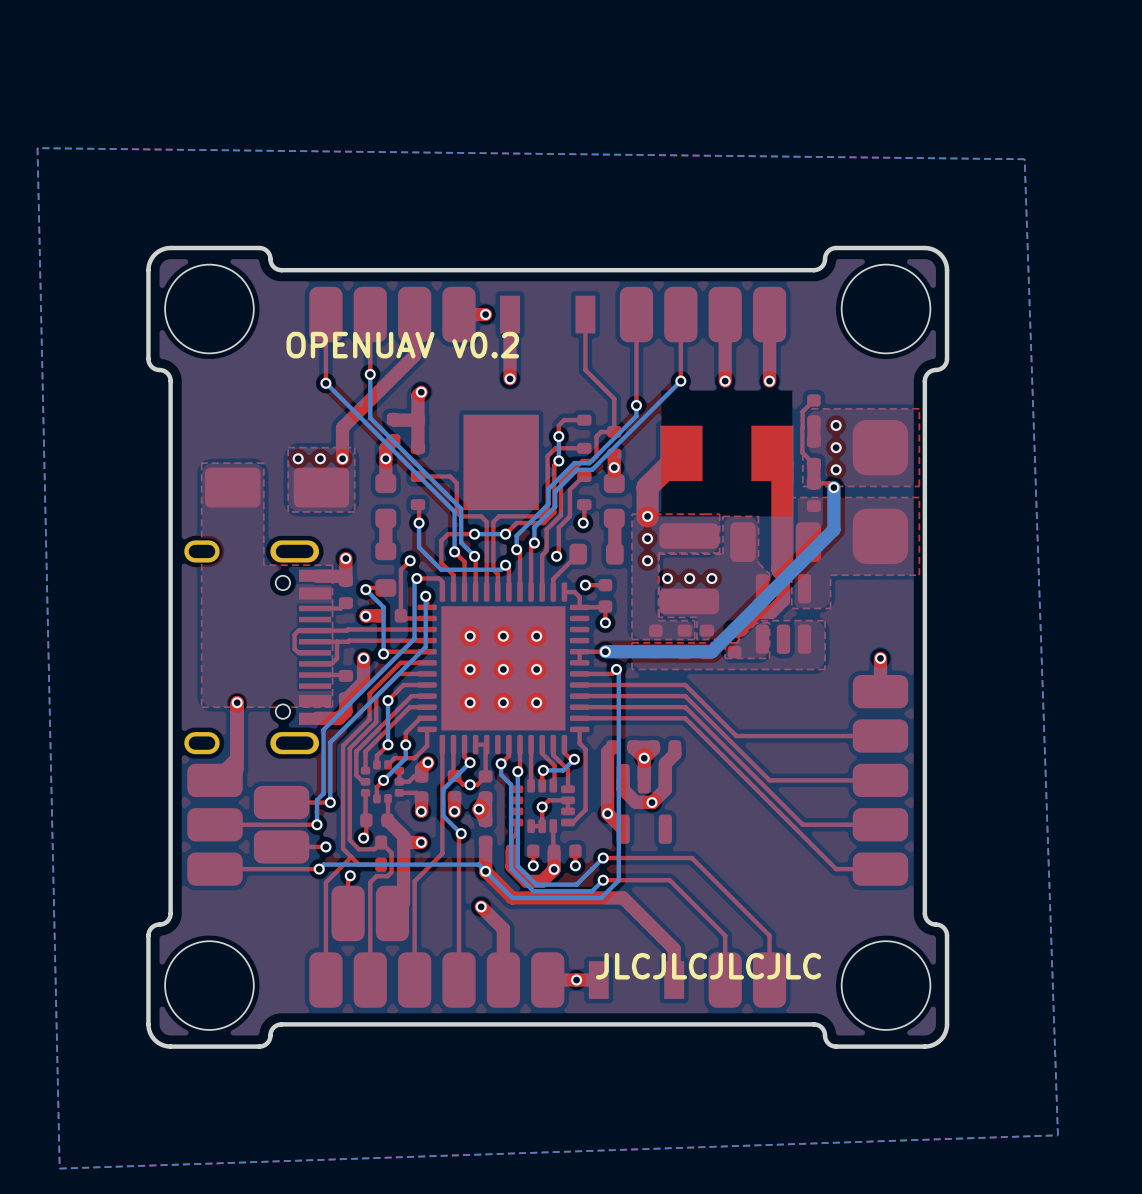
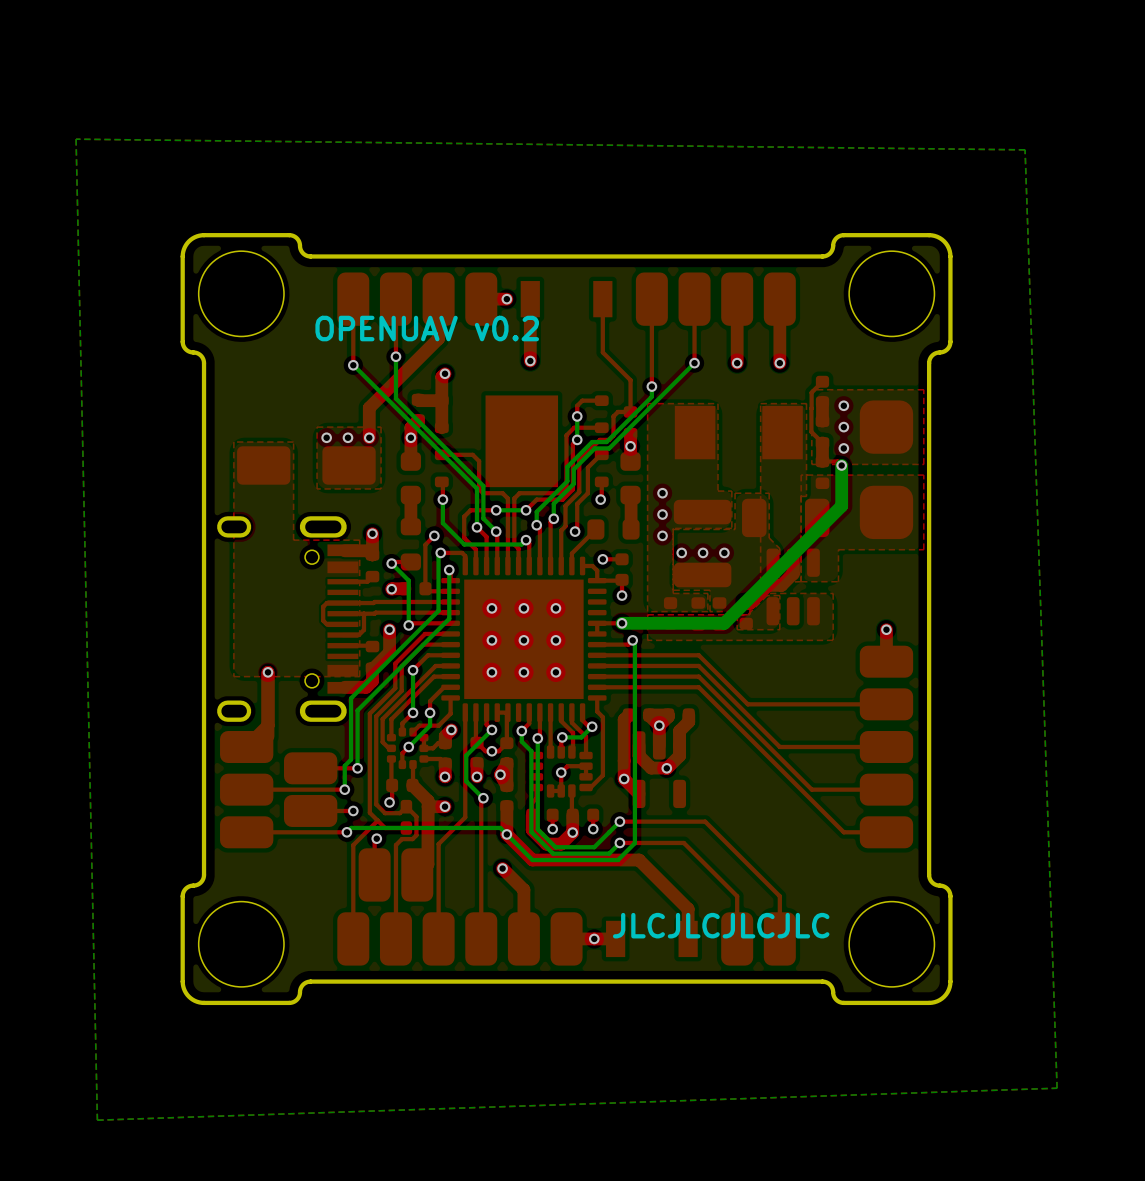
top track: (681, 453) (647, 487) (647, 516) -> none
top track: (772, 453) (782, 463) (782, 569) -> none
top zone outline: (705, 514) (632, 514) -> (717, 491) (717, 403) (647, 403) (647, 491)
top zone outline: none -> (801, 496) (806, 496) (806, 403) (760, 403) (760, 582) (801, 581)

